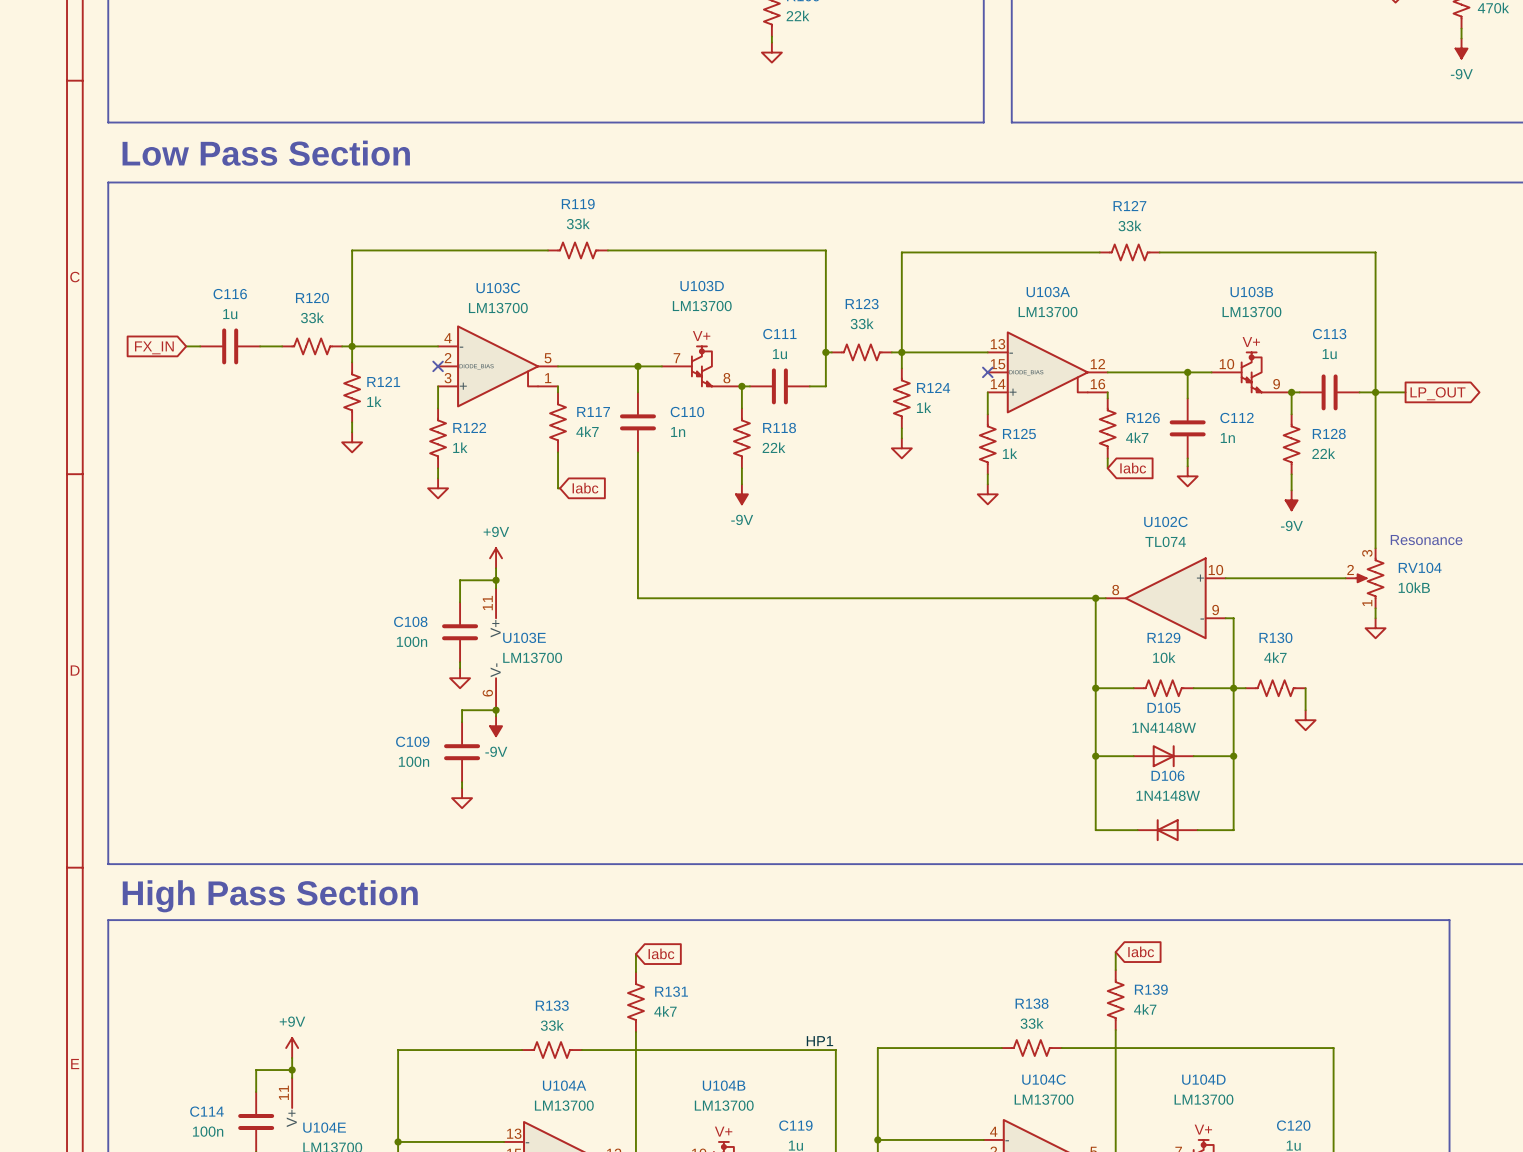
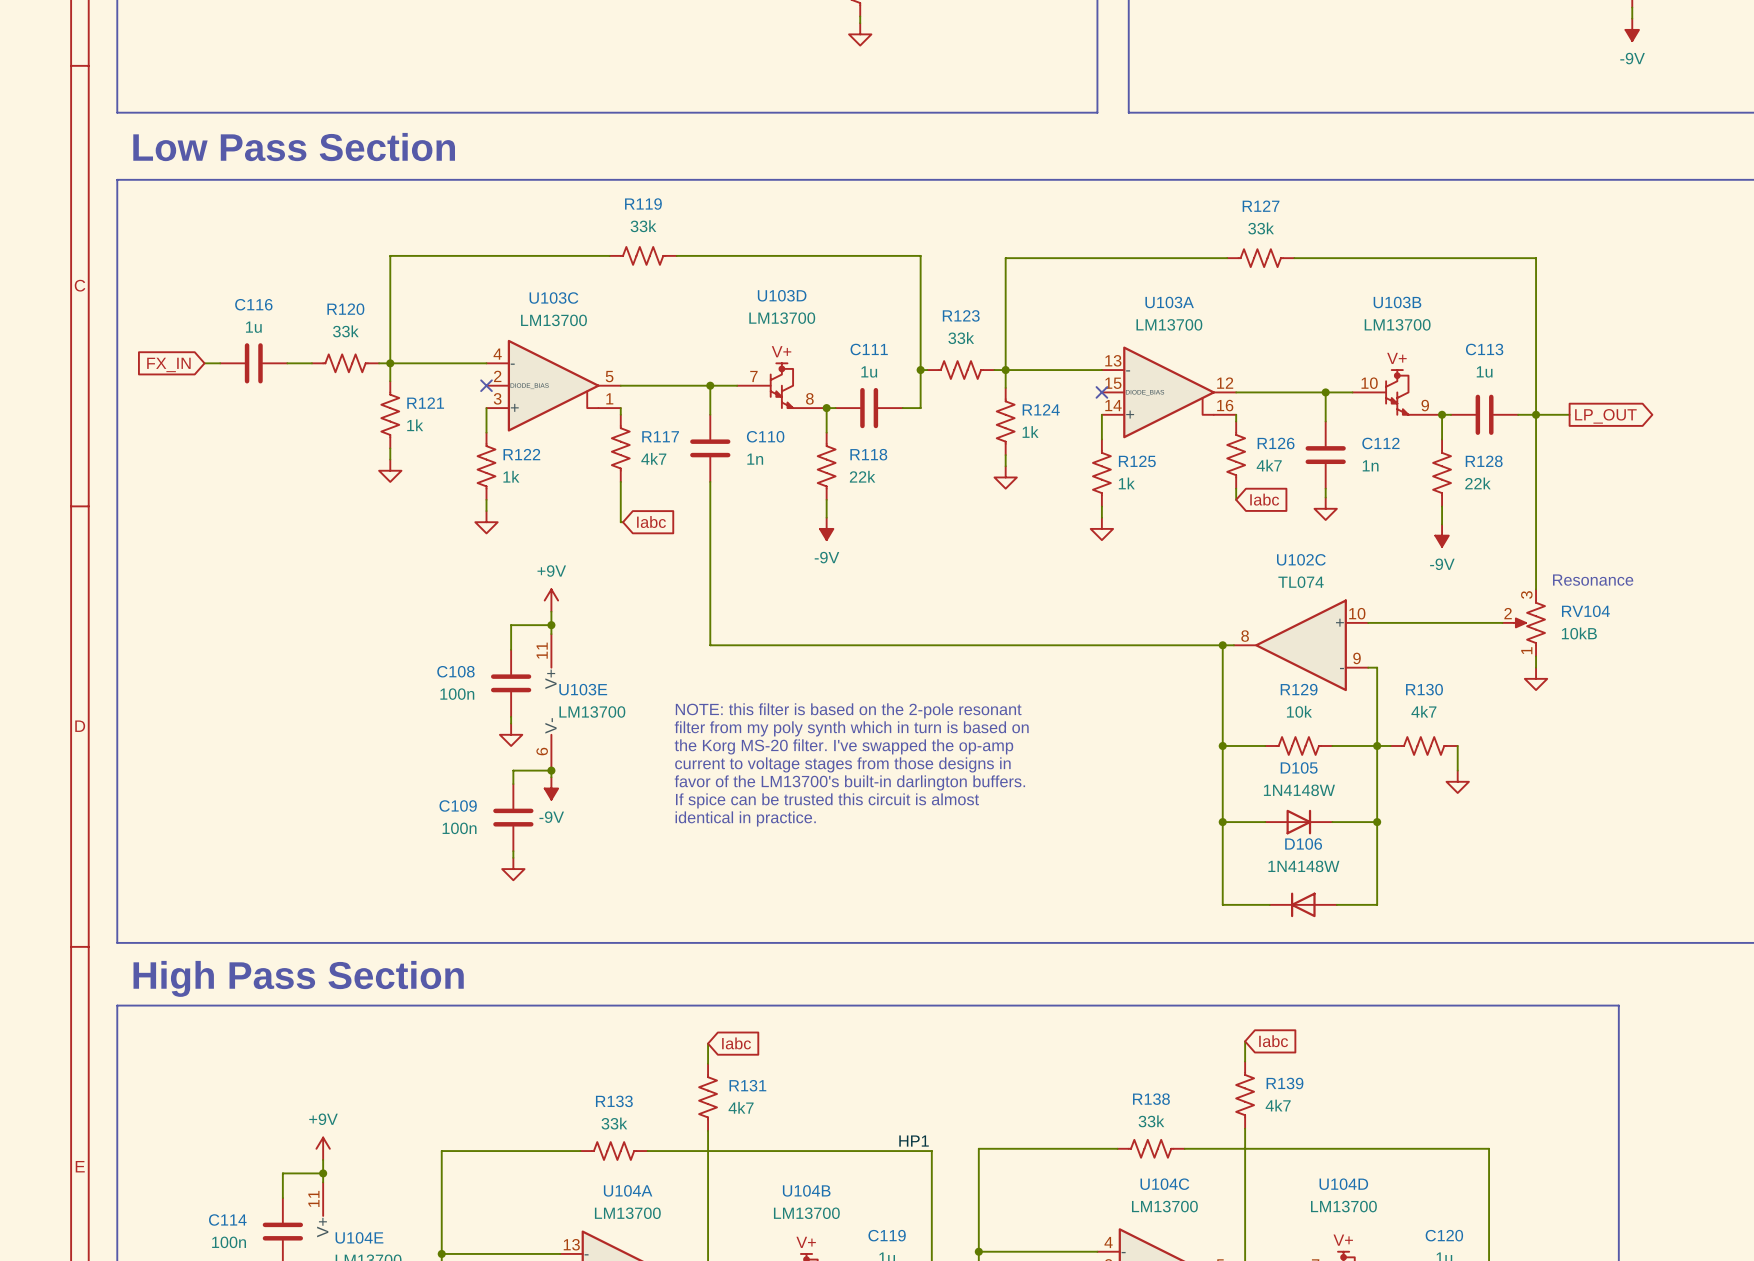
text: none -> NOTE: this filter is based on the 2-pole resonant (848, 710)
text: none -> filter from my poly synth which in turn is based on (851, 728)
text: none -> the Korg MS-20 filter. I've swapped the op-amp (843, 746)
text: none -> current to voltage stages from those designs in (842, 764)
text: none -> favor of the LM13700's built-in darlington buffers. (849, 782)
text: none -> If spice can be trusted this circuit is almost (827, 800)
text: none -> identical in practice. (745, 818)

